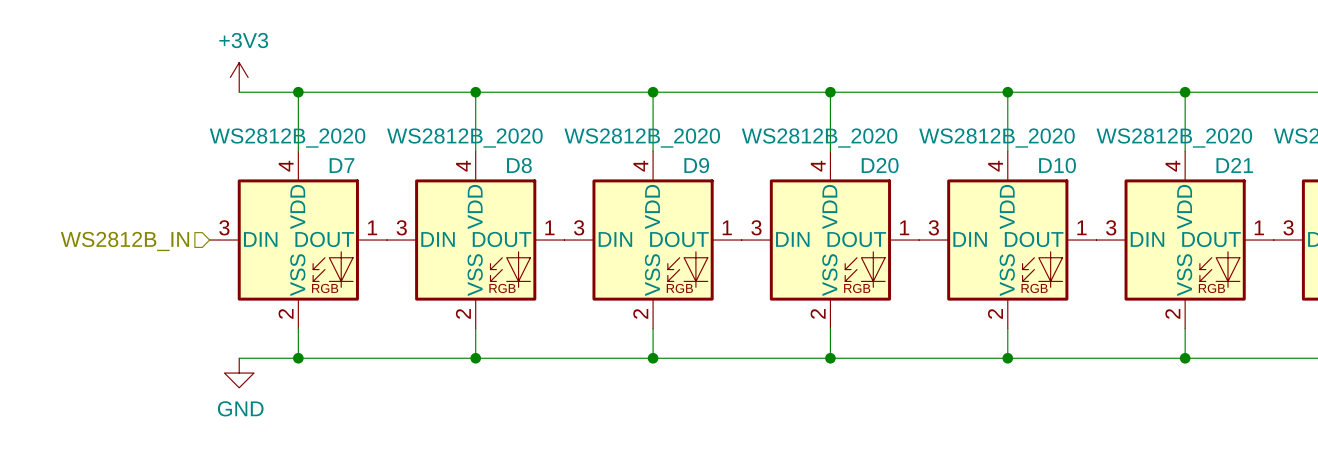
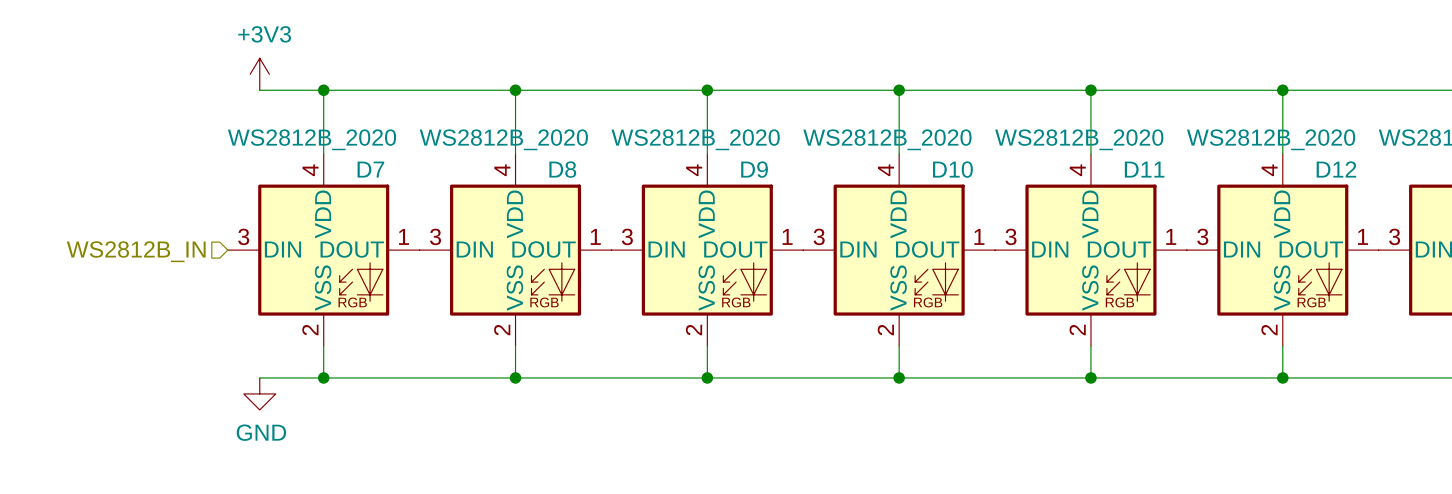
D20 name: D20 (880, 165) -> D10 (952, 169)
D10 name: D10 (1057, 165) -> D11 (1144, 169)
D21 name: D21 (1234, 165) -> D12 (1336, 169)

